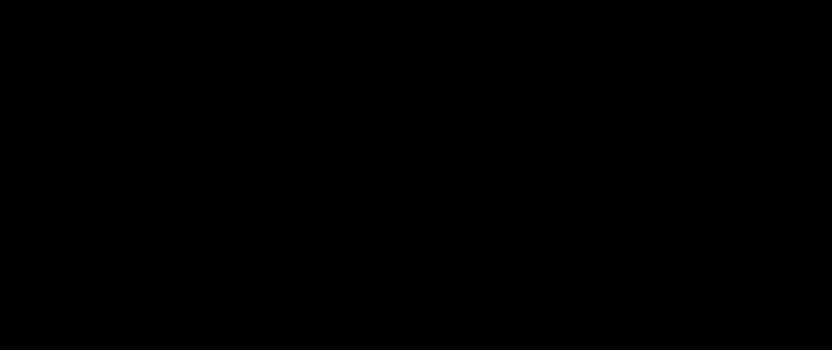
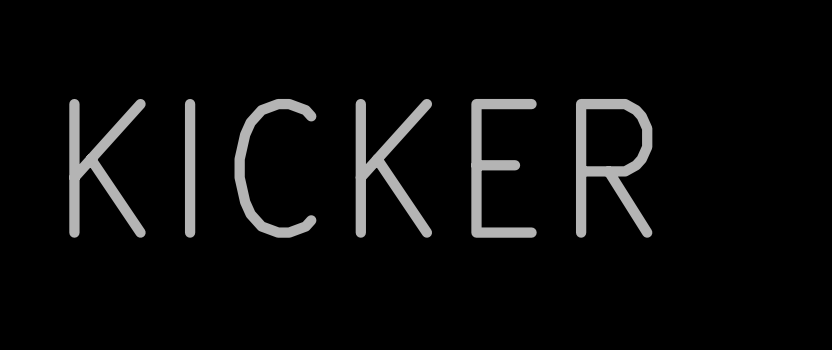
text: none -> KICKER (360, 168)

